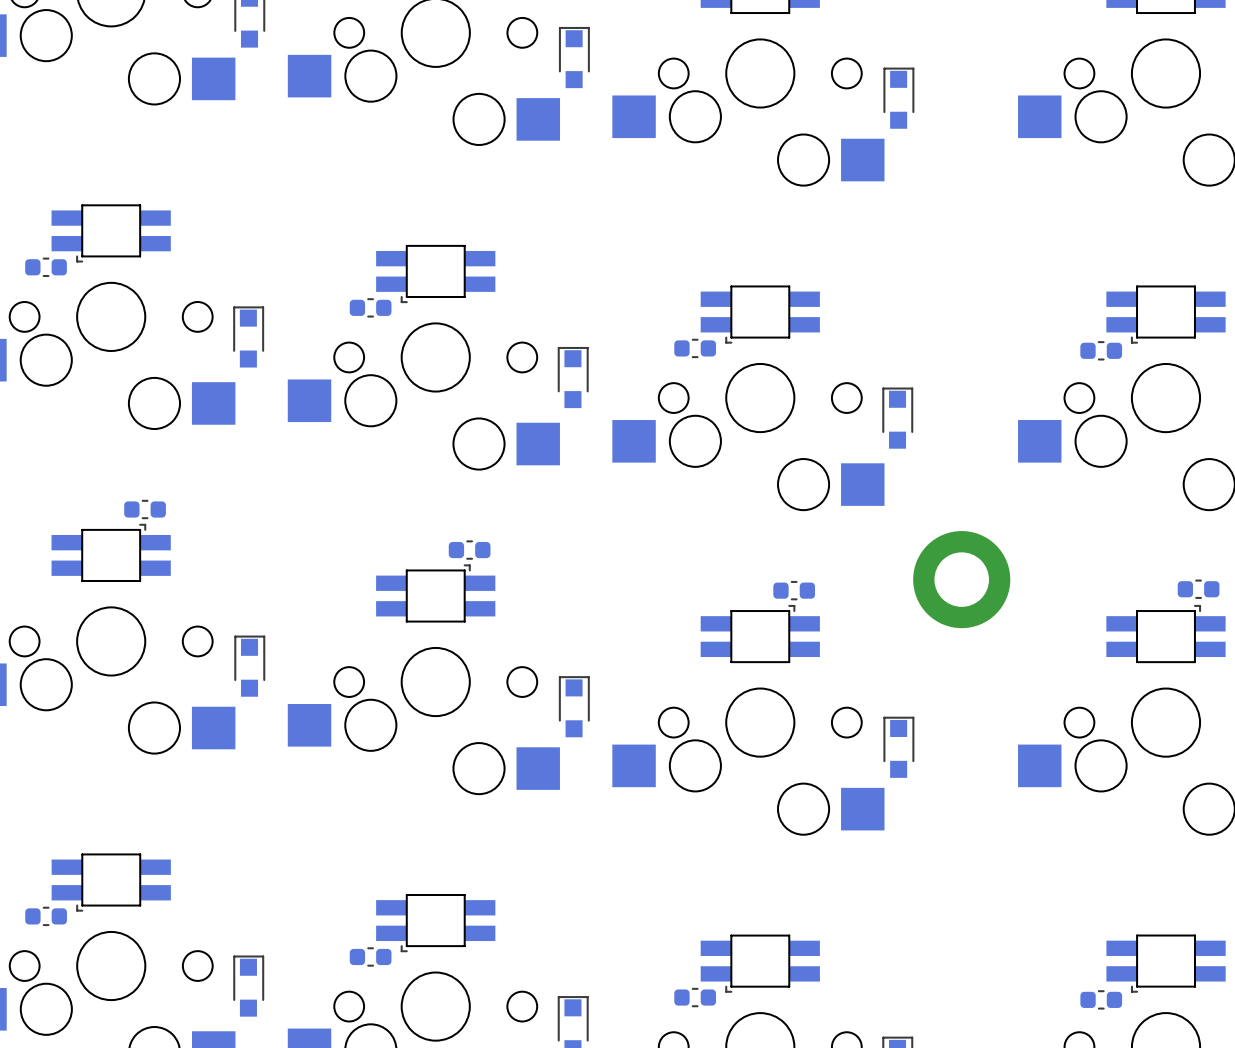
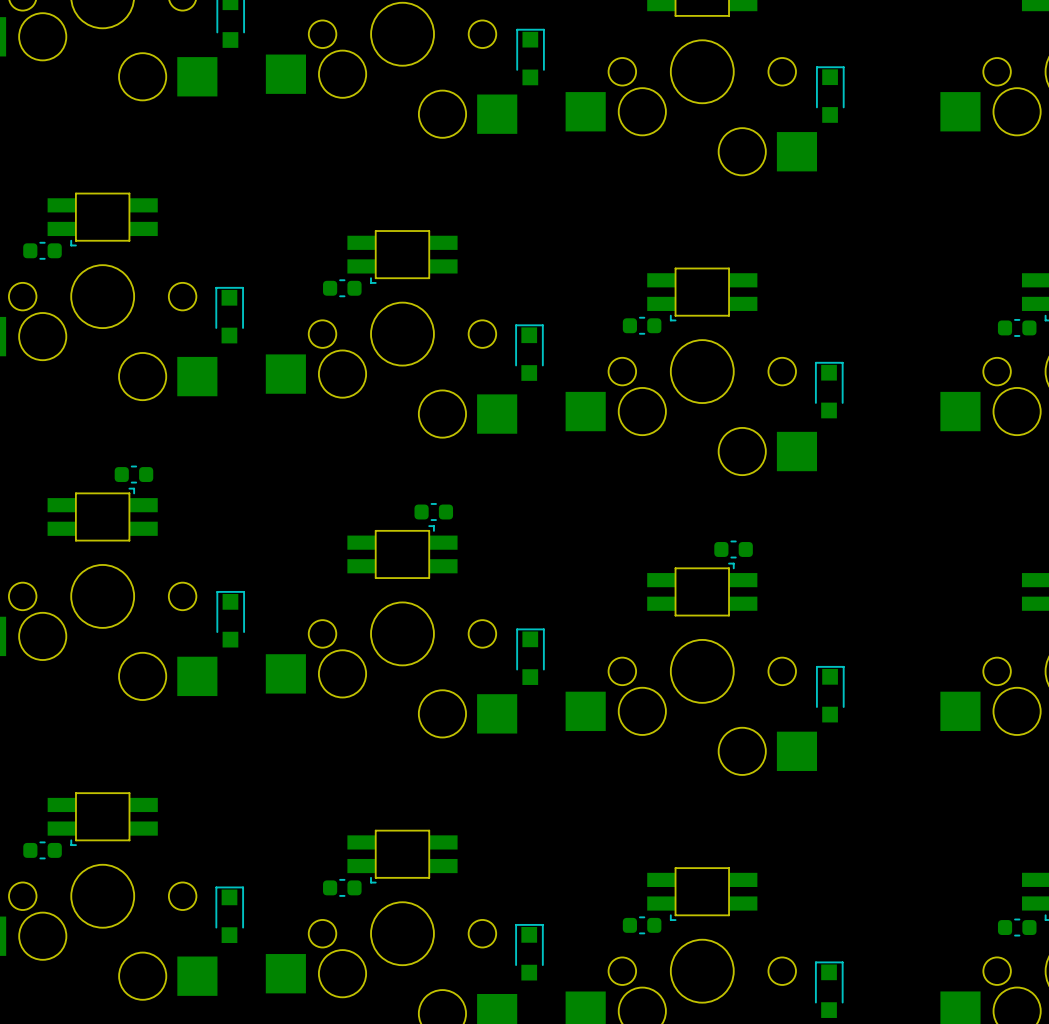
part: (961, 579) -> none

